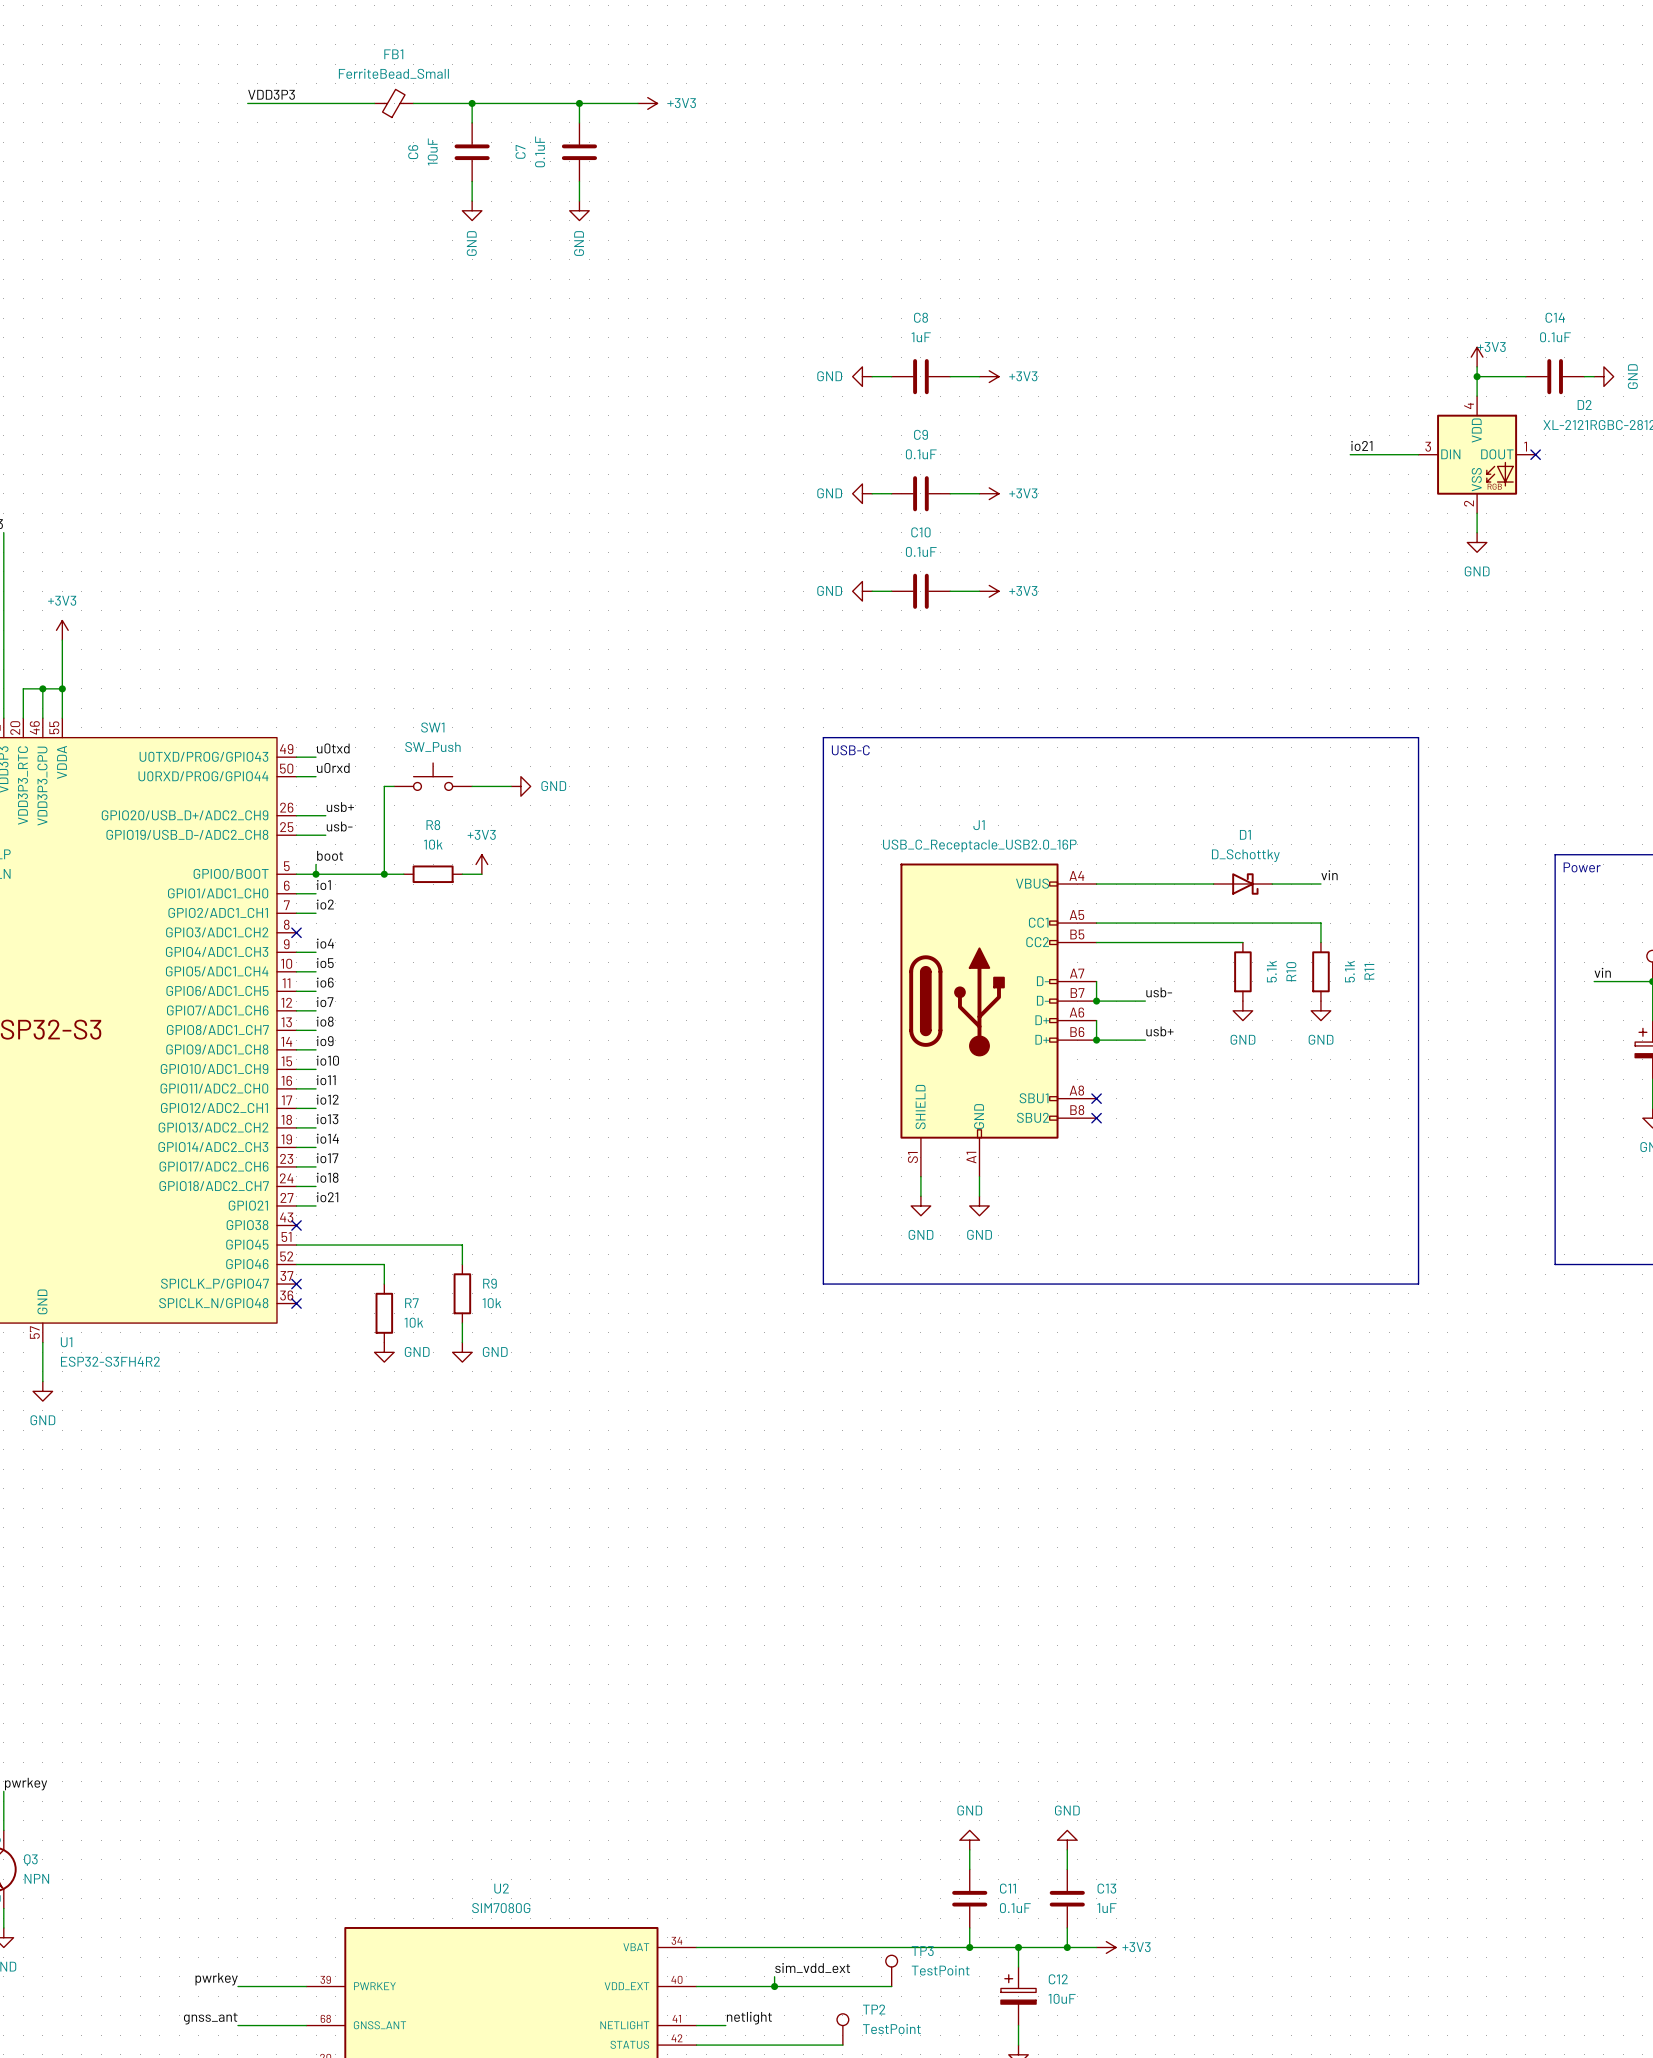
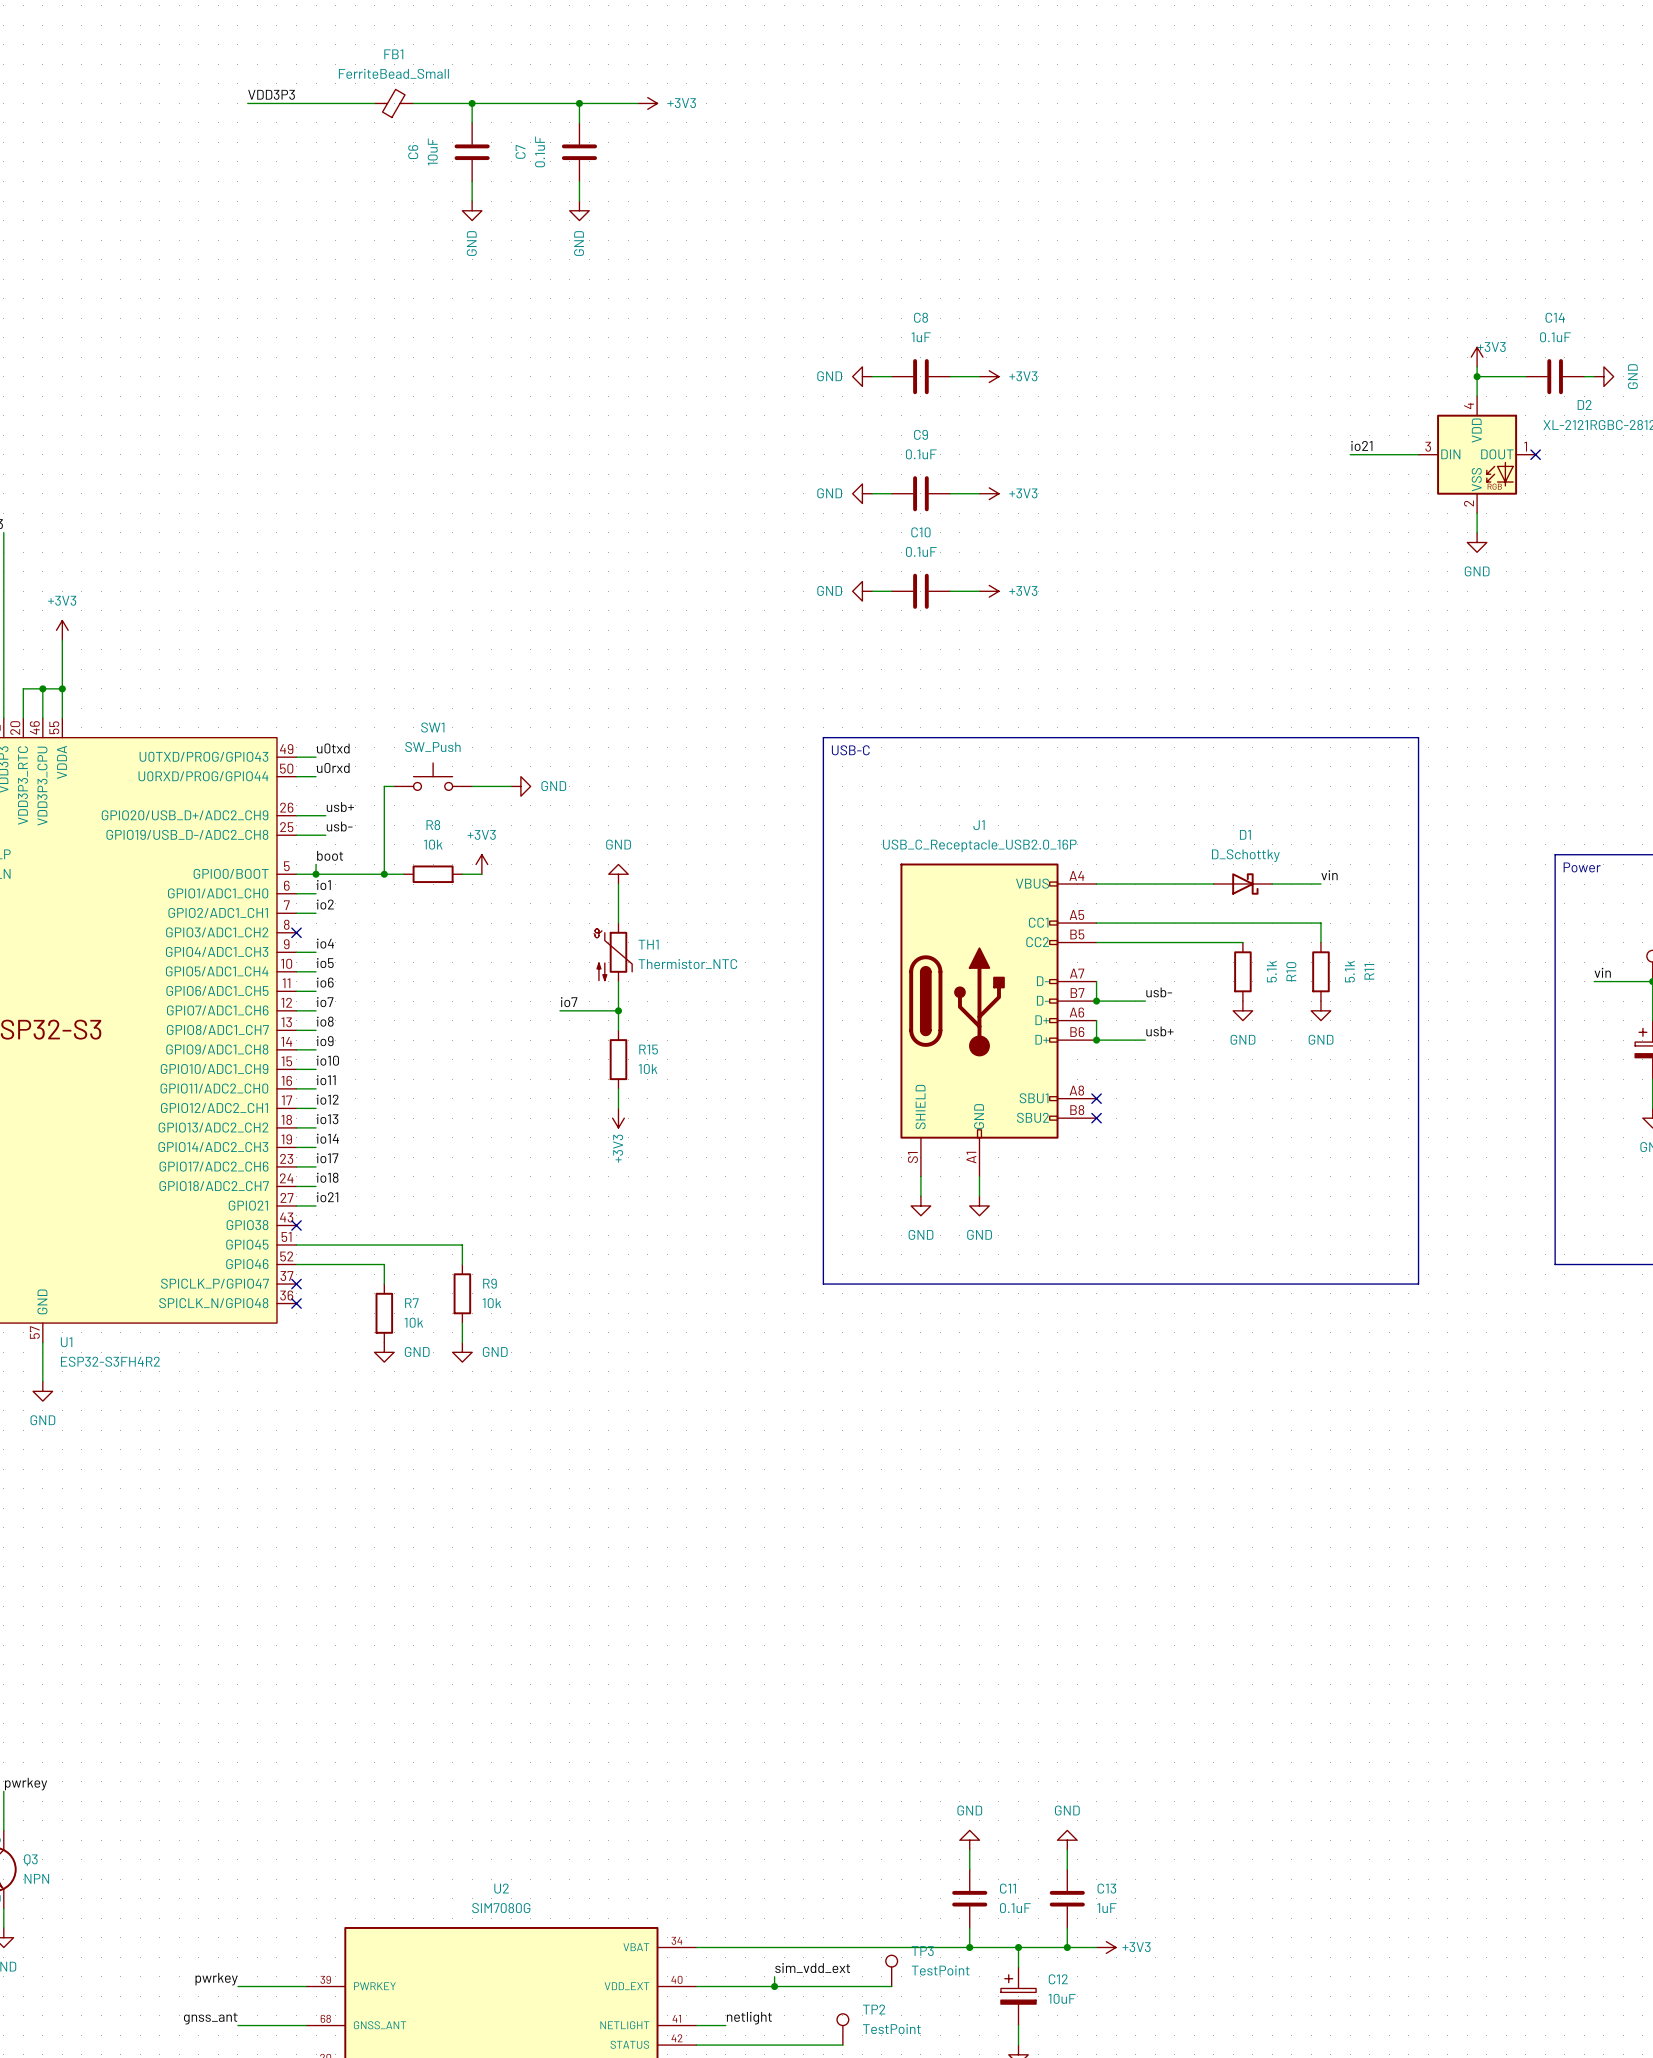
power symbol: none -> GND (618, 874)
wire: none -> (618, 884) (618, 923)
TH1: none -> Thermistor_NTC (613, 952)
wire: none -> (618, 981) (618, 1030)
label: none -> io7 (569, 1002)
wire: none -> (559, 1010) (618, 1010)
junction: none -> (618, 1010)
R15: none -> 10k (618, 1059)
wire: none -> (618, 1088) (618, 1108)
power symbol: none -> +3V3 (618, 1118)

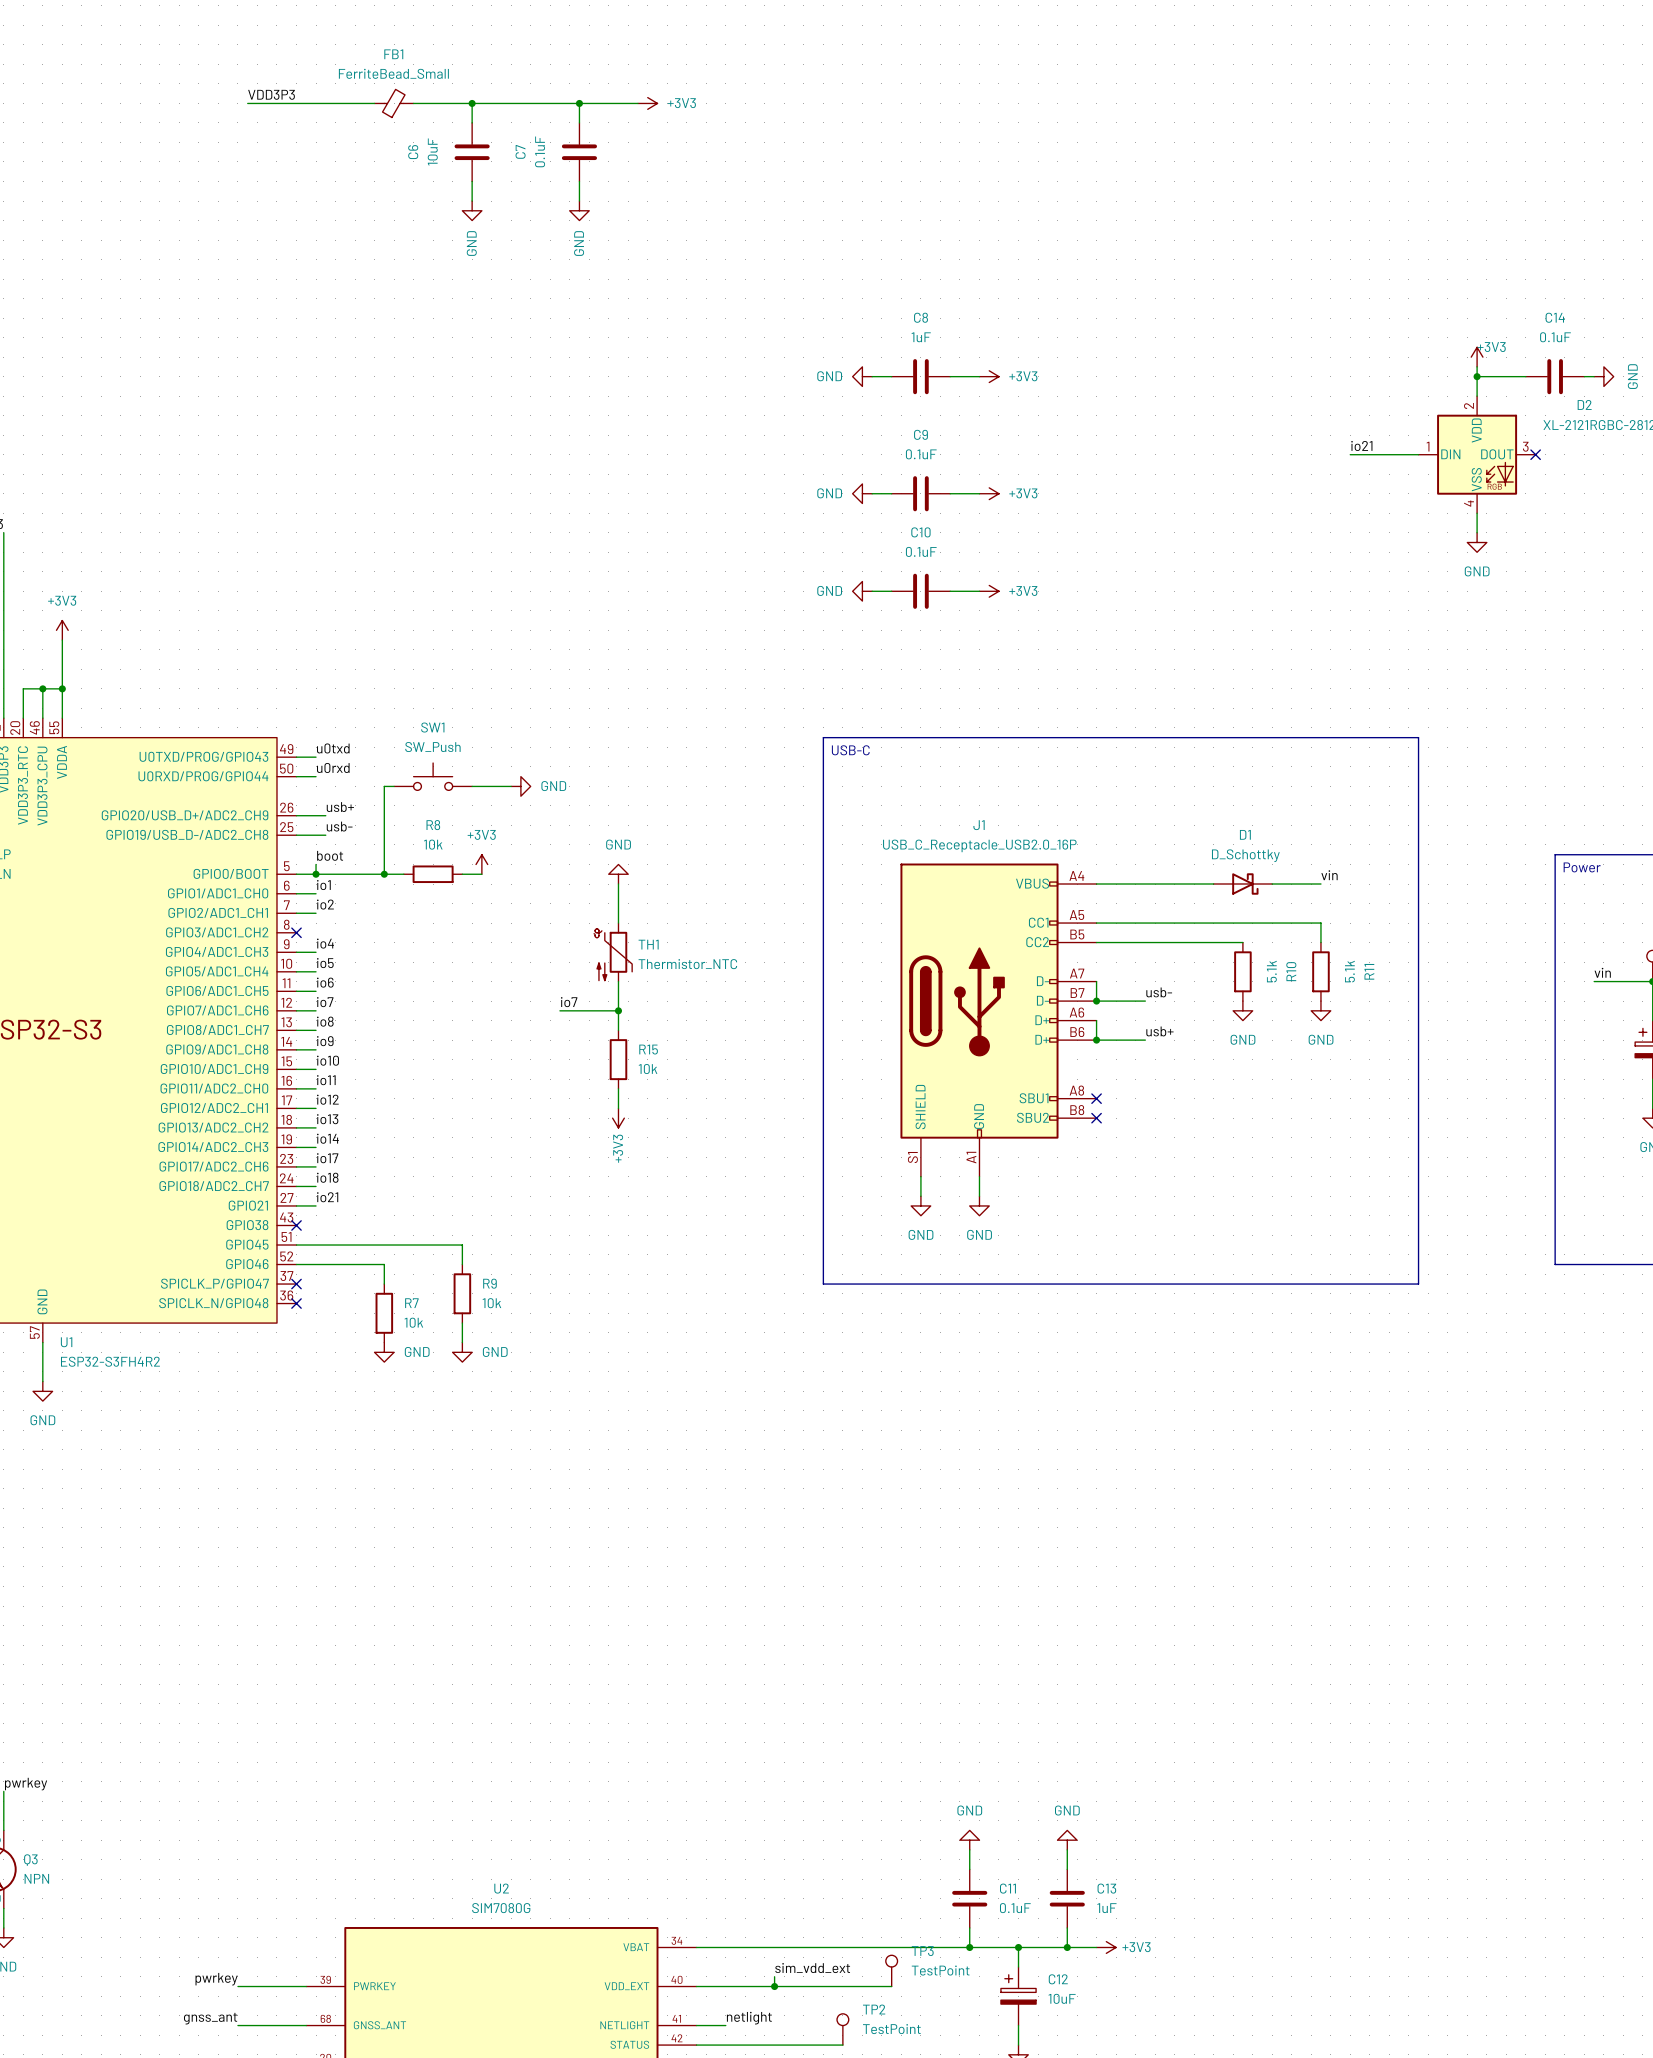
D2 pin number: 4 (1469, 406) -> 2 (1468, 405)
D2 pin number: 3 (1428, 446) -> 1 (1428, 446)
D2 pin number: 1 (1525, 446) -> 3 (1525, 446)
D2 pin number: 2 (1468, 503) -> 4 (1469, 503)

